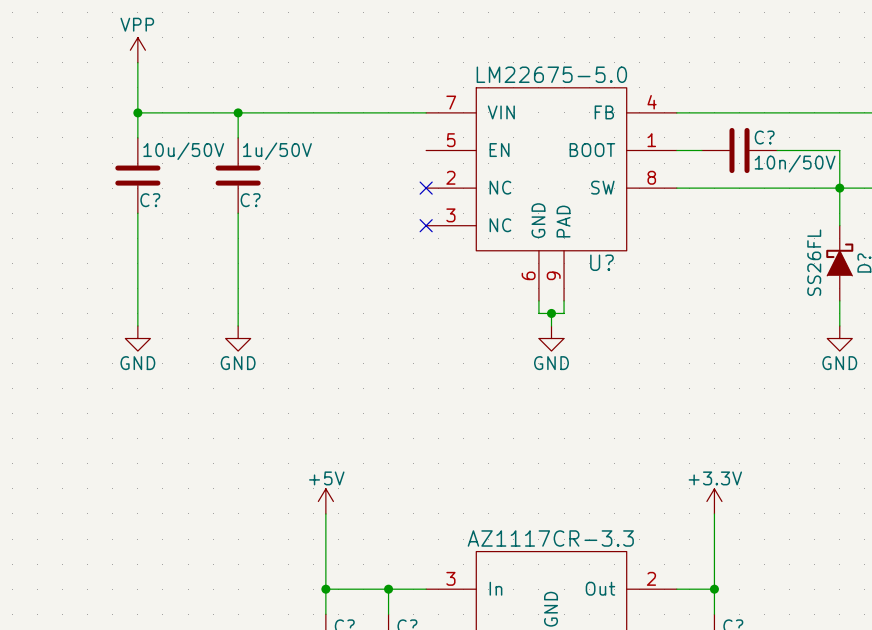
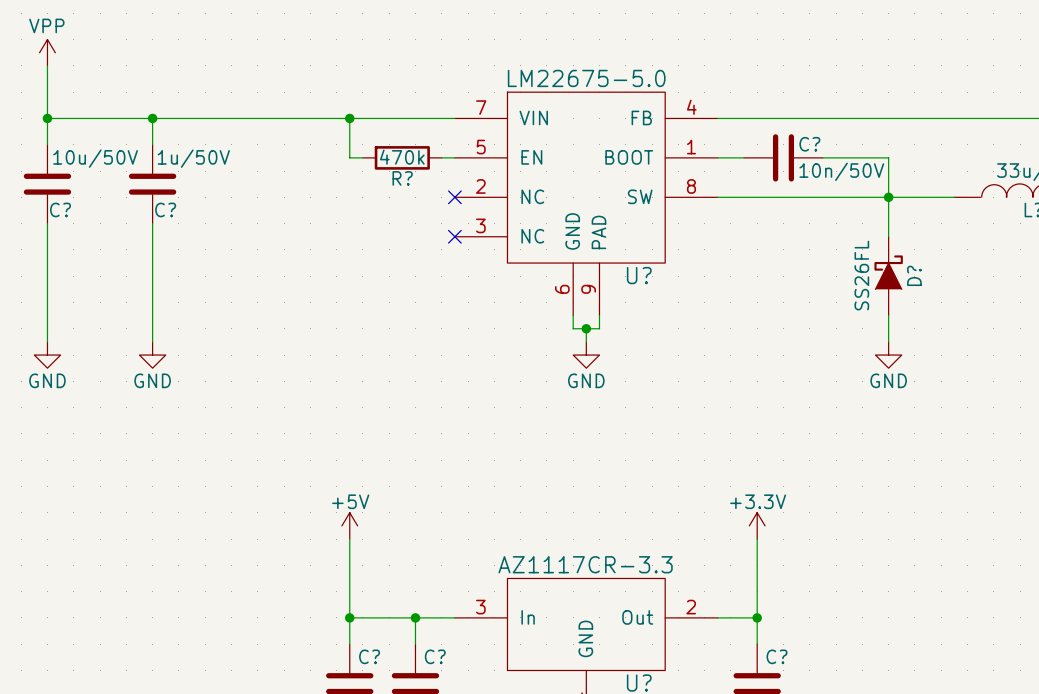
power symbol position: VPP (137, 50) -> VPP (47, 52)
wire: none -> (47, 65) (47, 144)
wire: (137, 62) (137, 112) -> (47, 118) (152, 118)
junction: none -> (47, 118)
wire: (238, 112) (238, 137) -> none
junction: (238, 112) -> none
wire: none -> (349, 118) (349, 157) (362, 157)
junction: none -> (349, 118)
R?: none -> 470k (402, 157)
wire: none -> (441, 157) (454, 157)
C? value: 10u/50V (183, 151) -> 1u/50V (193, 158)
C?: none -> 10u/50V (47, 184)
C?: 1u/50V (238, 175) -> none
wire: (238, 213) (238, 325) -> (47, 223) (47, 341)
power symbol position: GND (238, 338) -> GND (47, 355)

